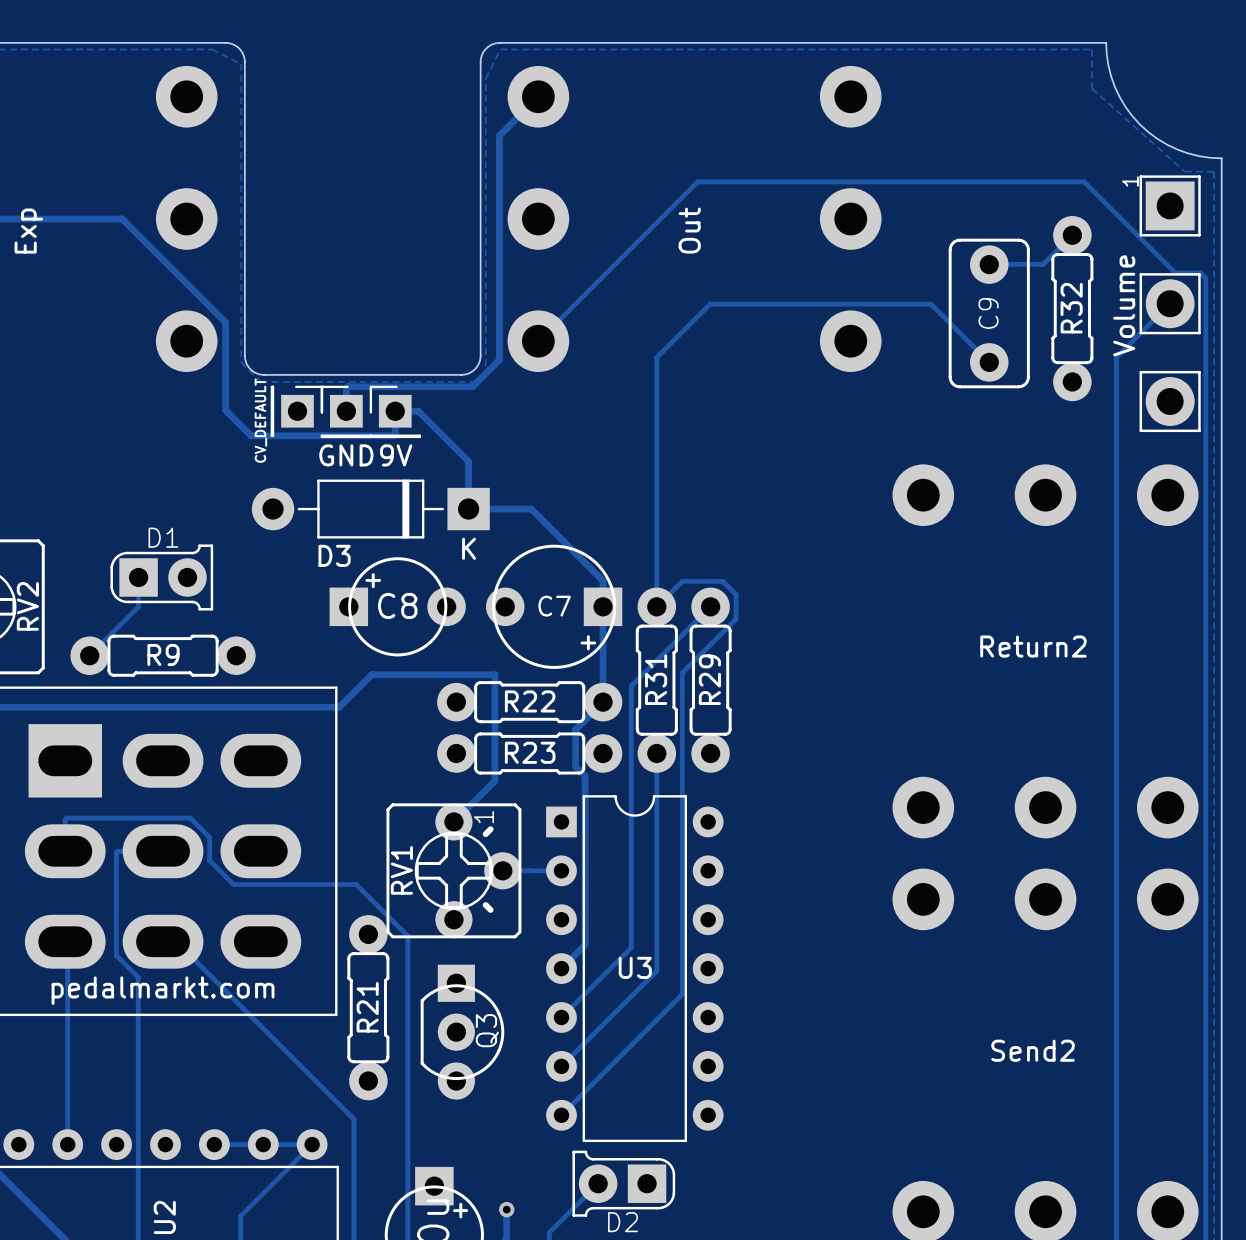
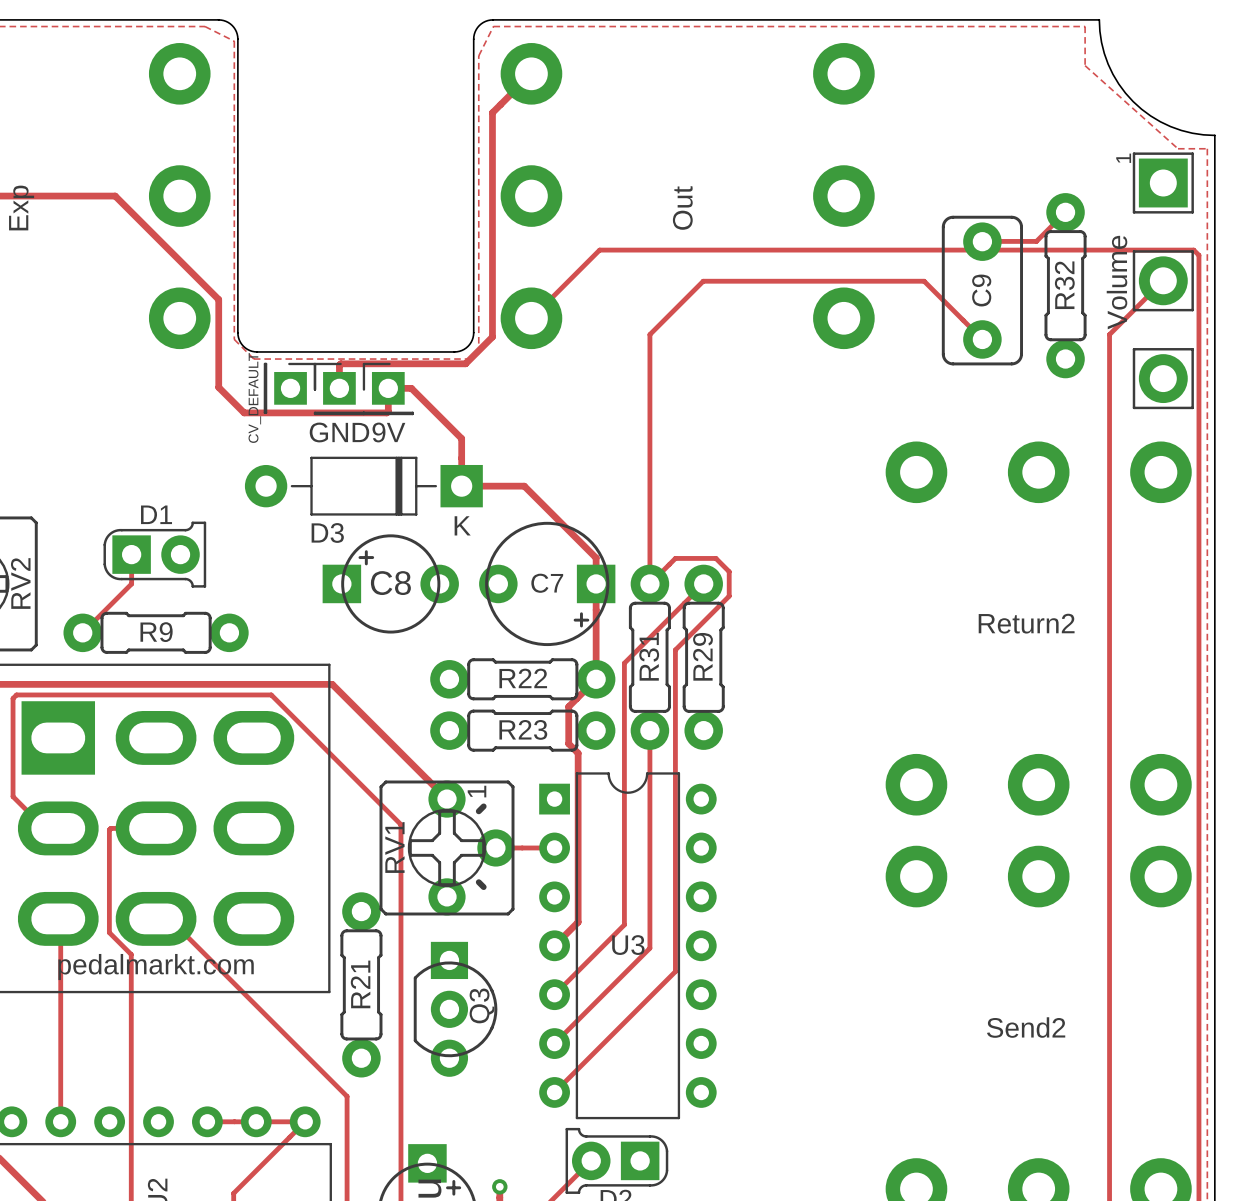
track: (606, 273) (697, 181) (1084, 181) (1175, 273) -> (599, 250) (1168, 250)
track: (339, 707) (371, 674) (494, 674) (494, 780) (453, 821) -> (332, 684) (447, 799)
track: (65, 851) (66, 818) (190, 818) (209, 837) (209, 860) (233, 884) (356, 884) (407, 936) -> (58, 828) (44, 828) (13, 796) (13, 698) (16, 694) (271, 694) (400, 824) (400, 913)

